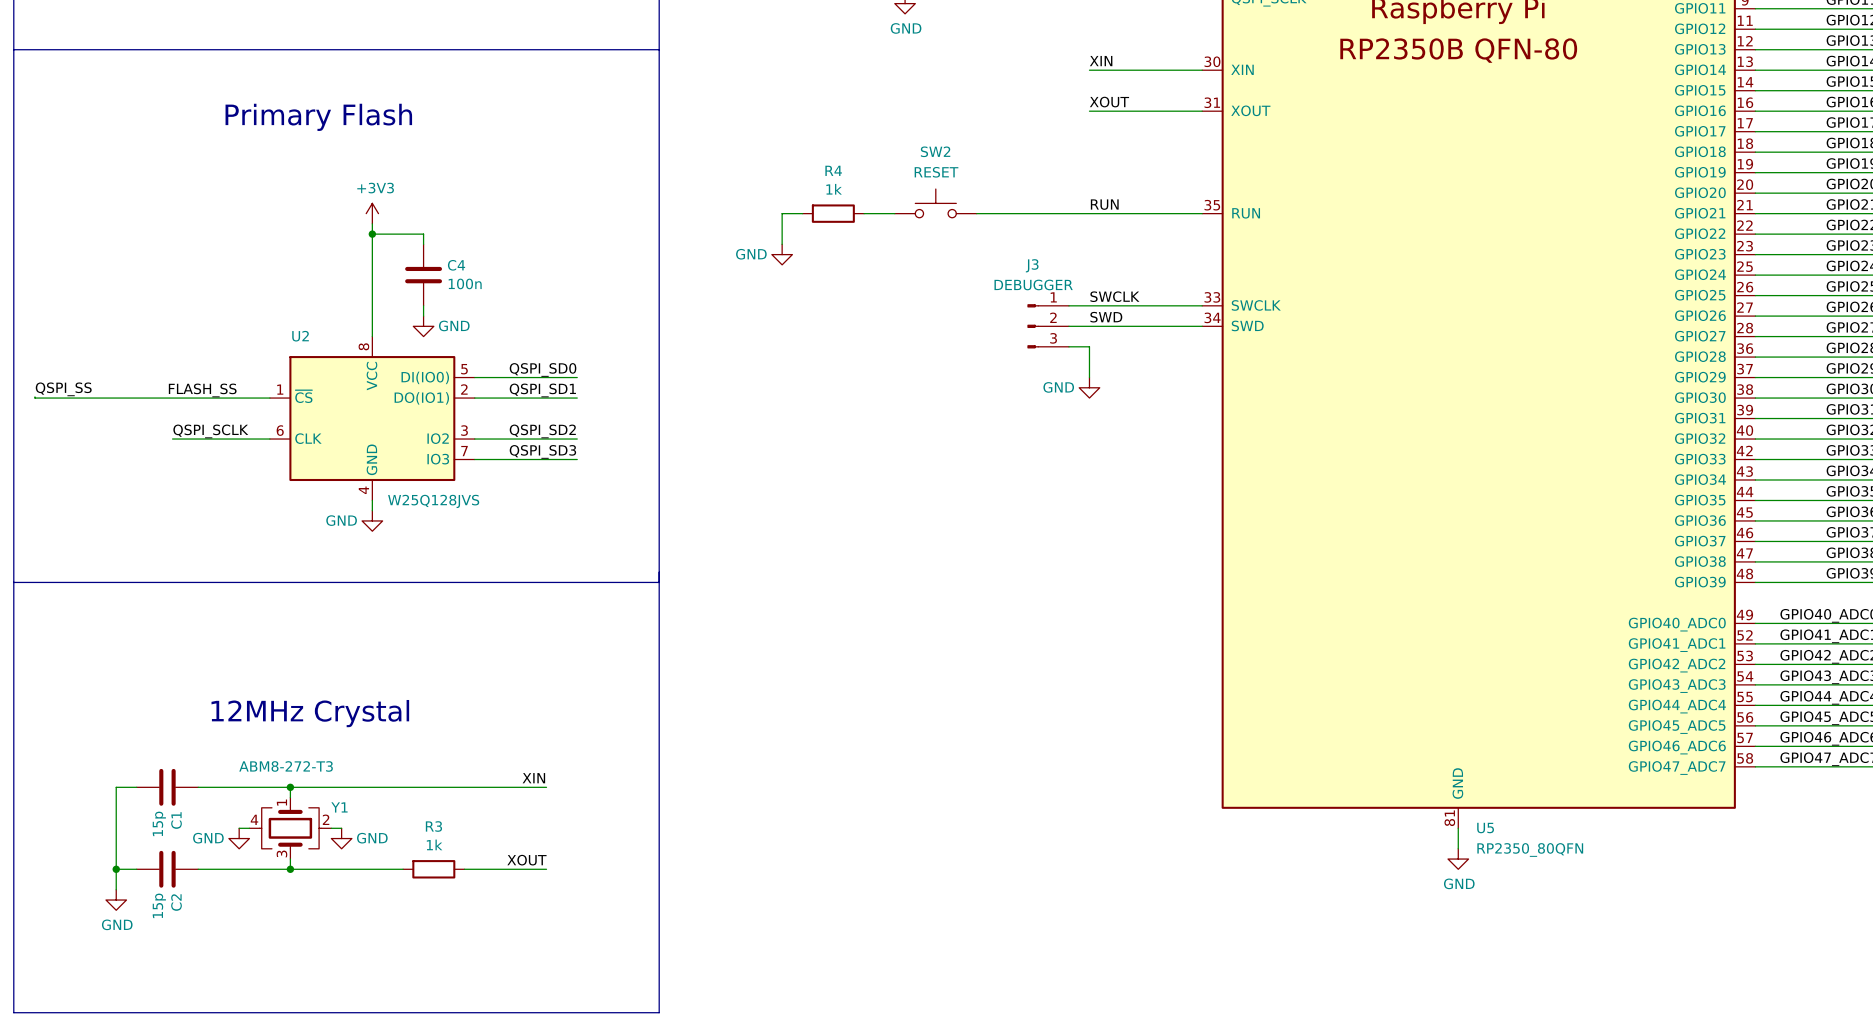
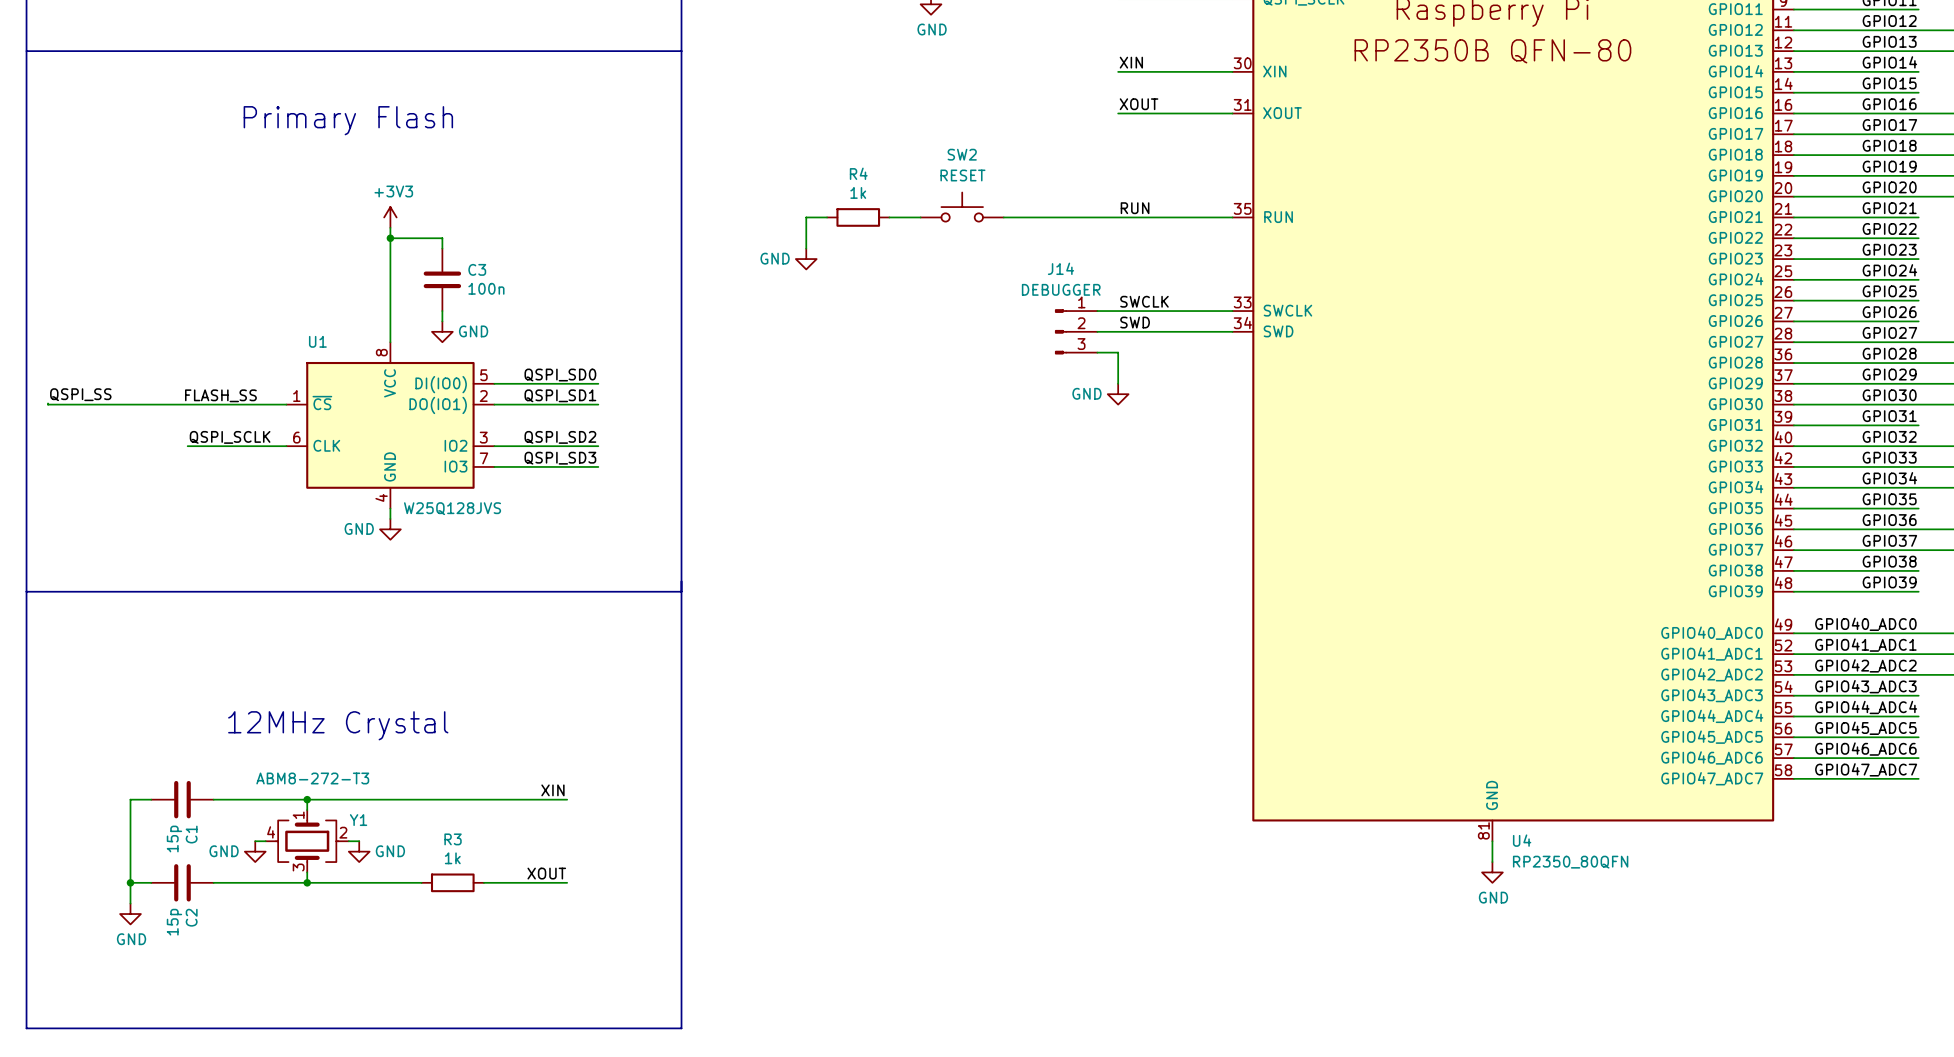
C4 name: C4 (456, 265) -> C3 (477, 269)
J3 name: J3 (1032, 265) -> J14 (1060, 268)
U2 name: U2 (300, 336) -> U1 (317, 341)
U5 name: U5 (1485, 828) -> U4 (1522, 840)

